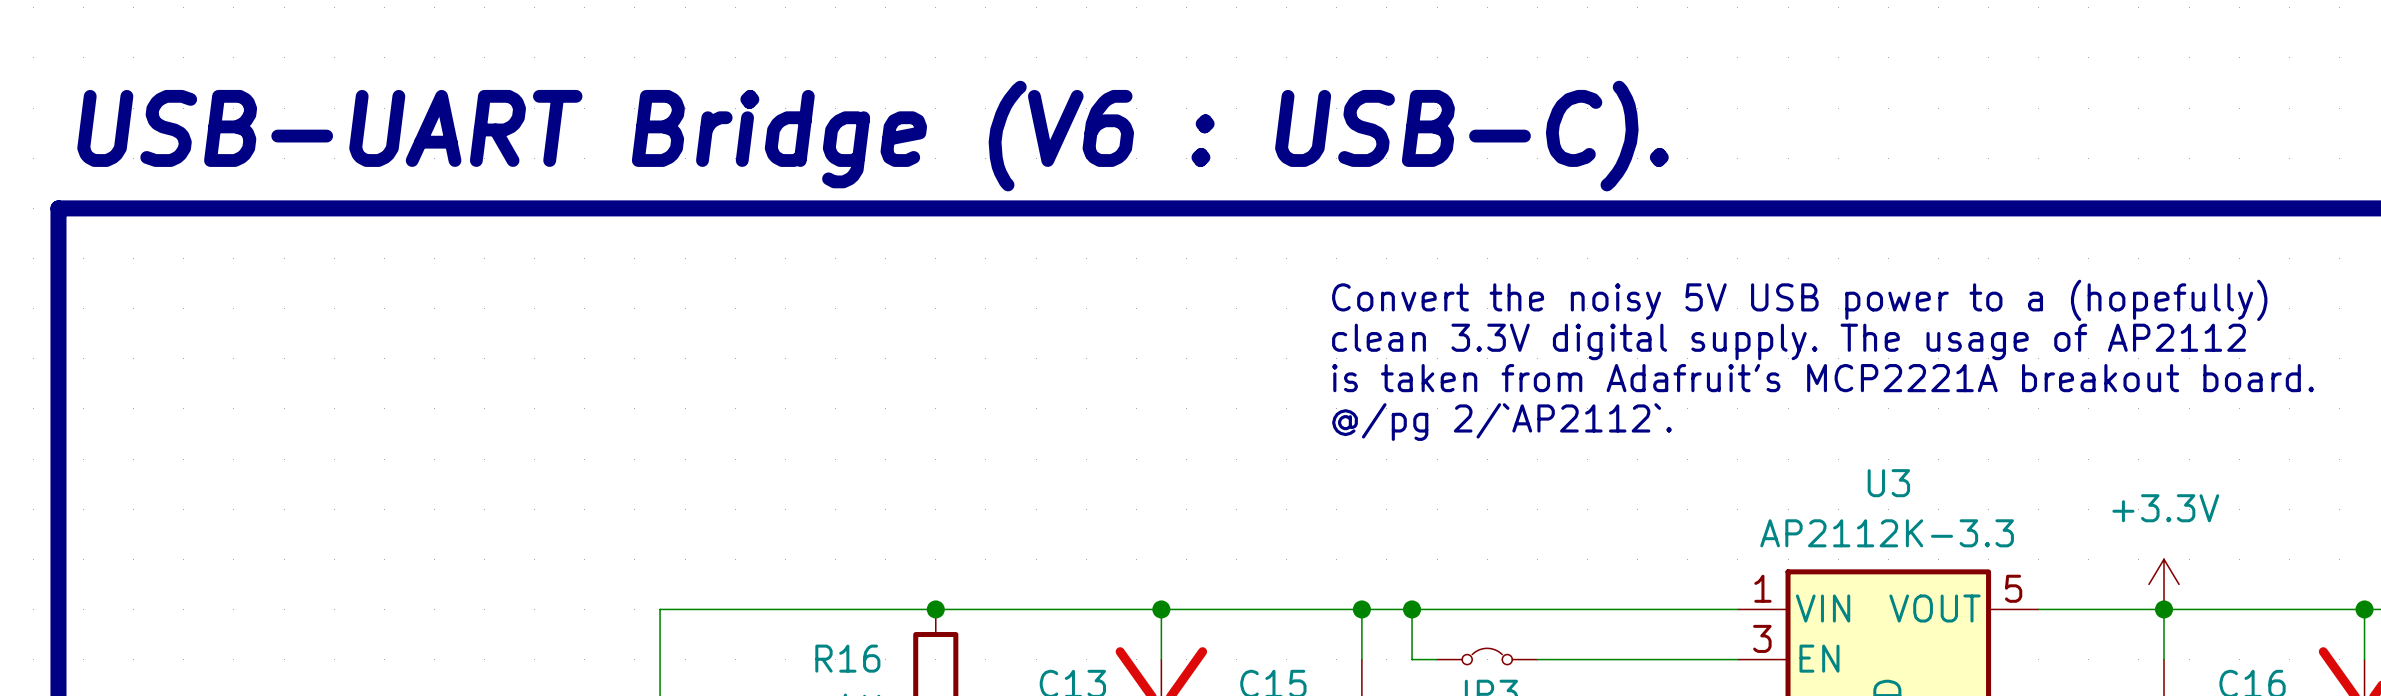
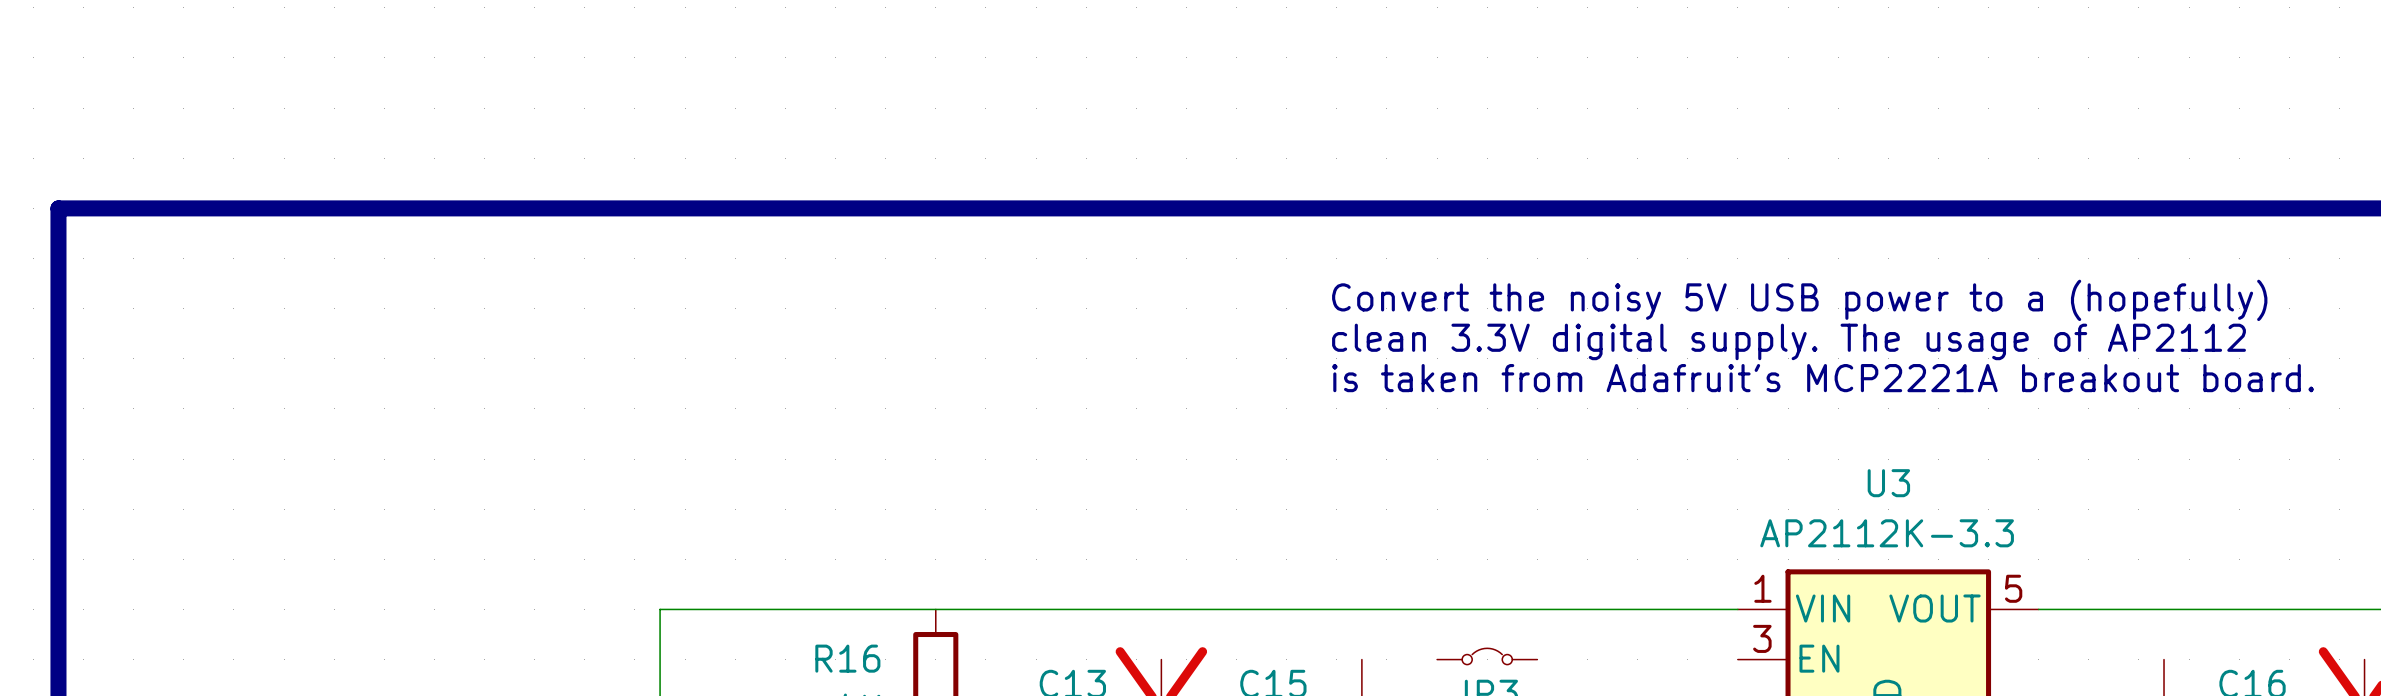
text: USB-UART Bridge (V6 : USB-C). (873, 136) -> none
text: @/pg 2/`AP2112`. (1501, 422) -> none
power symbol: +3.3V (2164, 584) -> none
junction: (935, 609) -> none
wire: (1161, 609) (1161, 659) -> none
junction: (1161, 609) -> none
wire: (1361, 609) (1361, 659) -> none
junction: (1361, 609) -> none
wire: (1412, 609) (1412, 659) (1437, 659) -> none
junction: (1412, 609) -> none
wire: (2164, 609) (2164, 659) -> none
junction: (2164, 609) -> none
wire: (2364, 609) (2364, 659) -> none
junction: (2364, 609) -> none
wire: (1537, 659) (1737, 659) -> none

